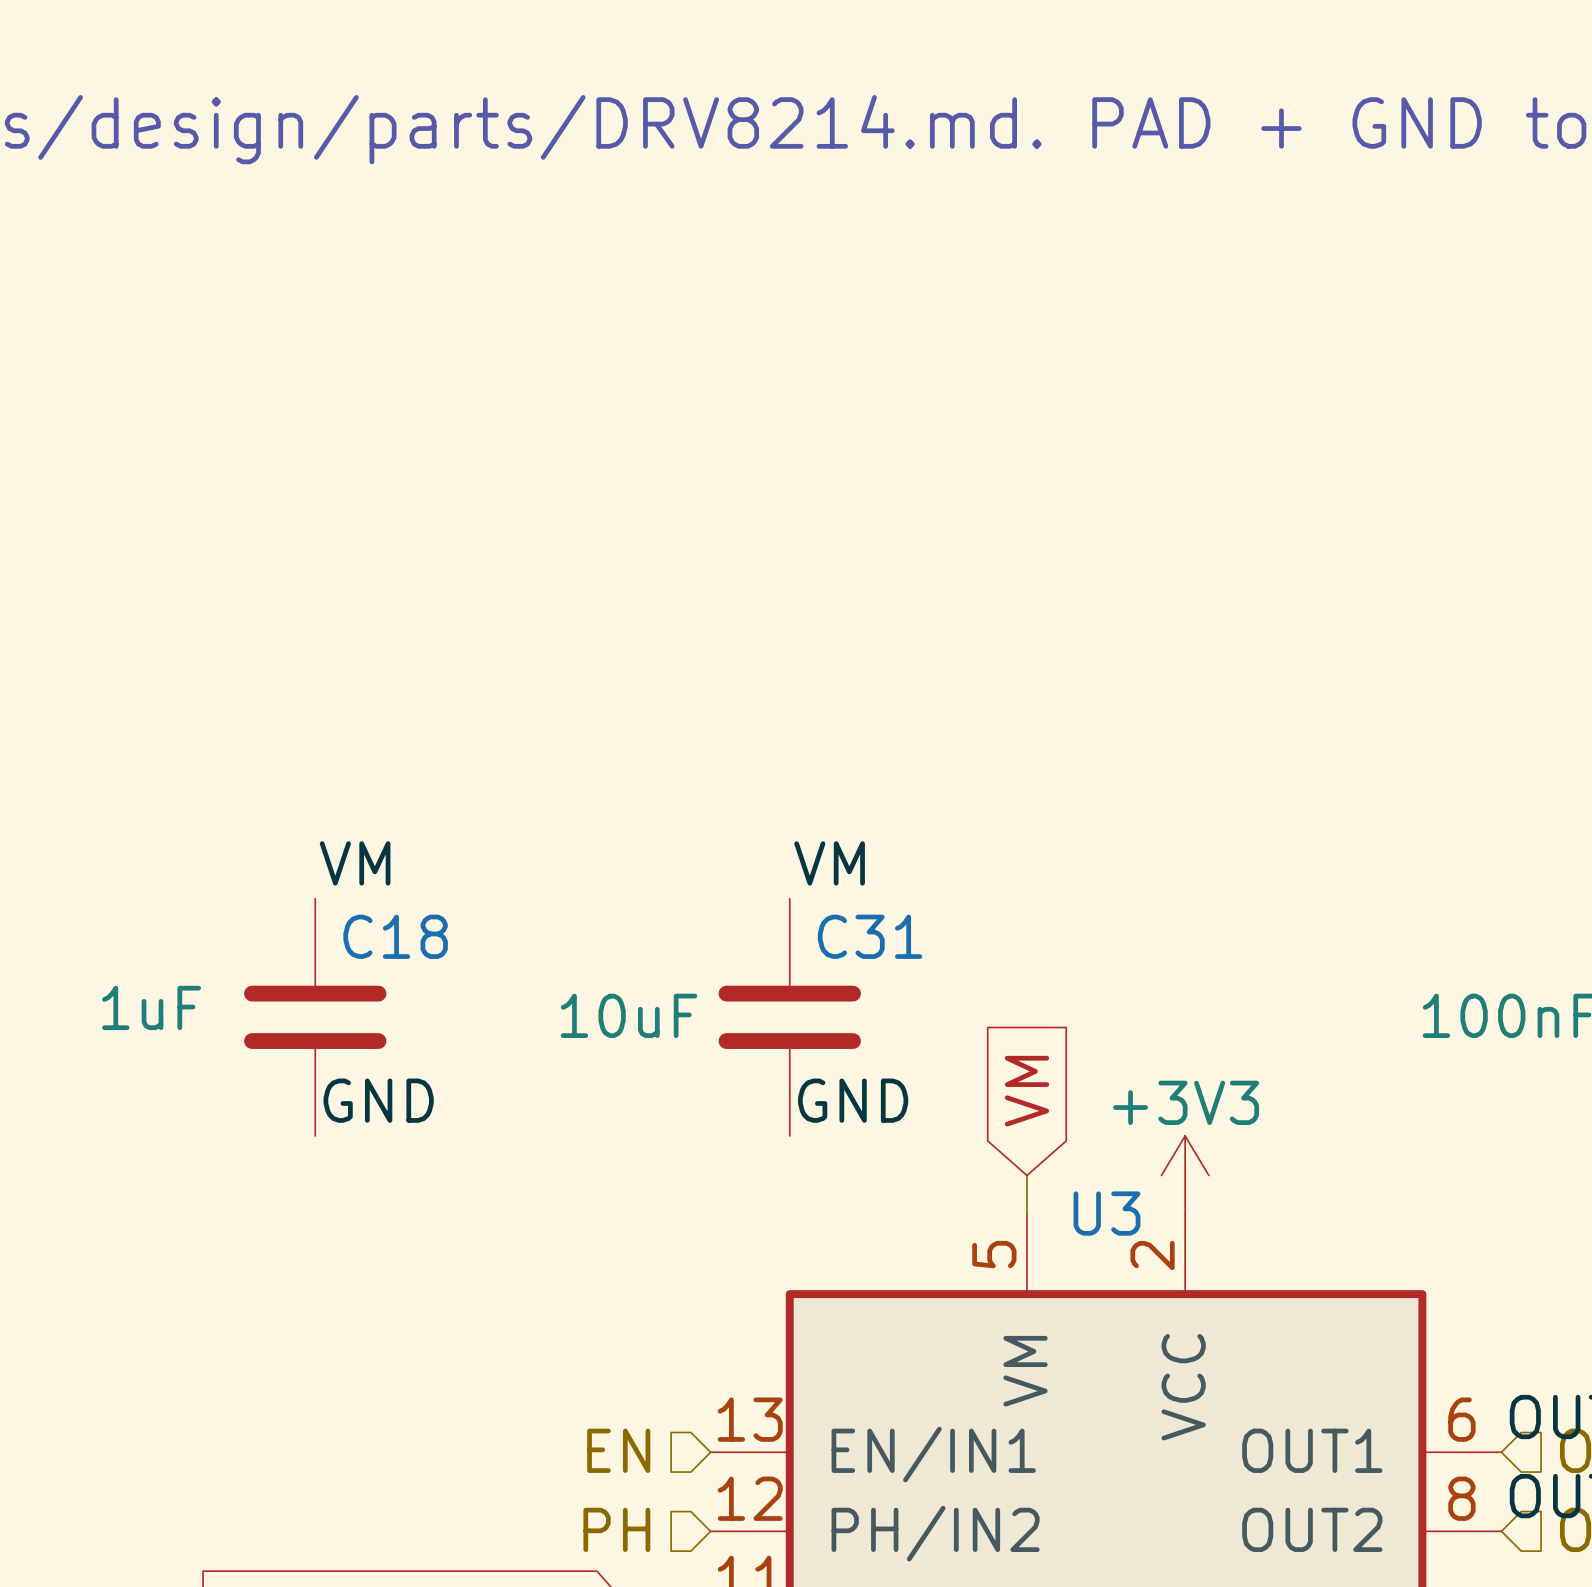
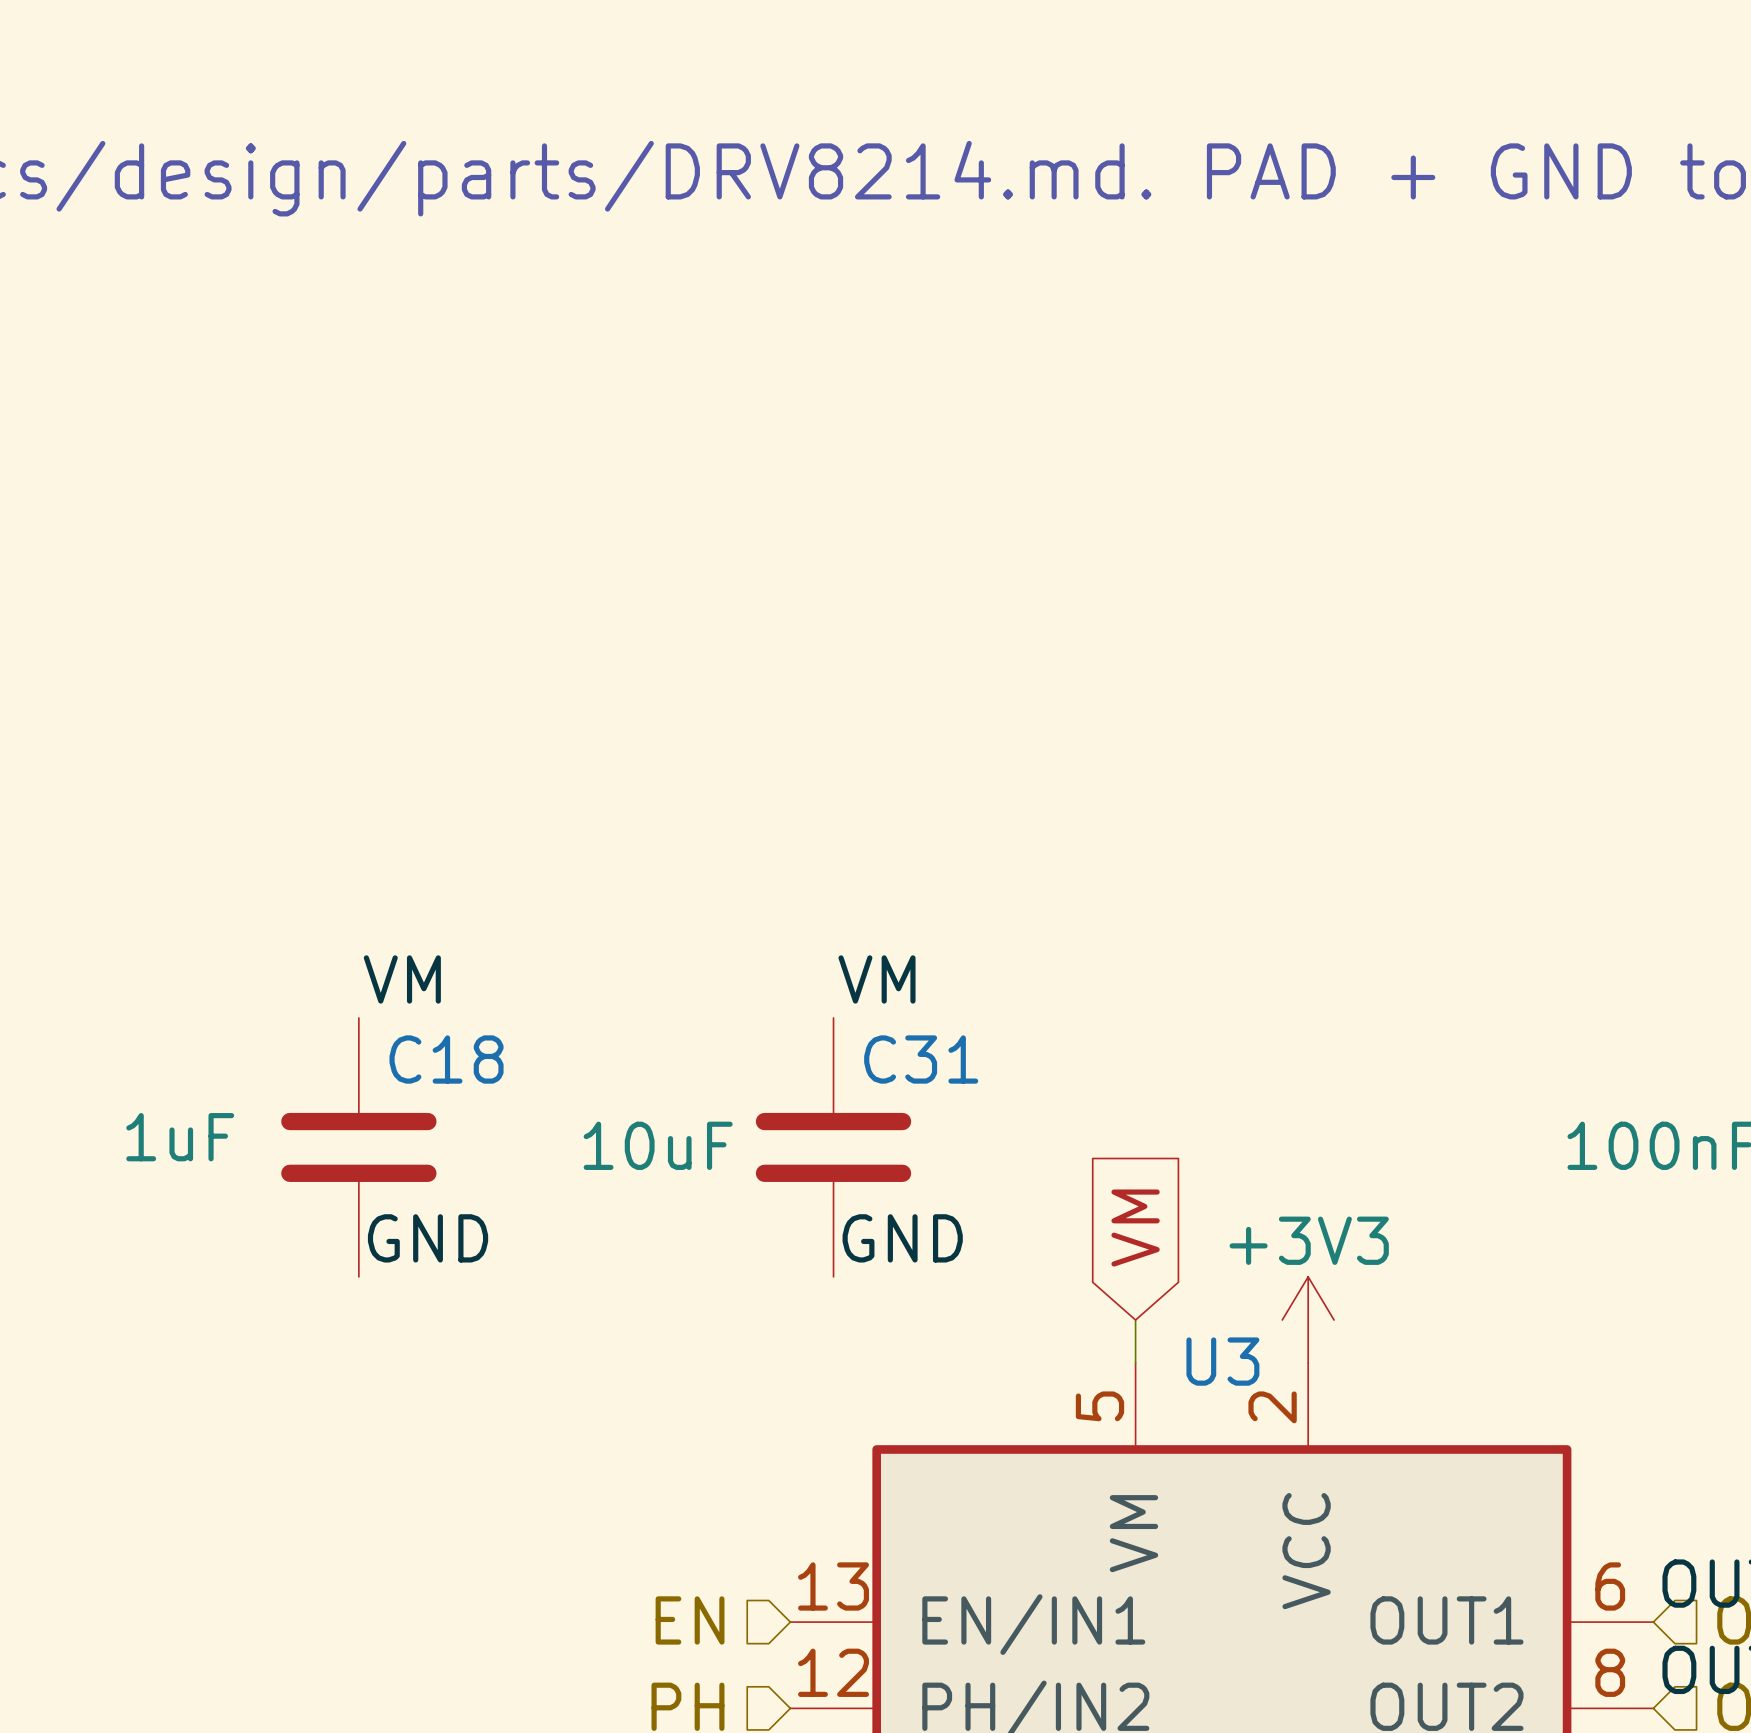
label position: VM (829, 863) -> VM (877, 979)
C31 position: (789, 1017) -> (833, 1147)
label position: GND (853, 1100) -> GND (902, 1238)

